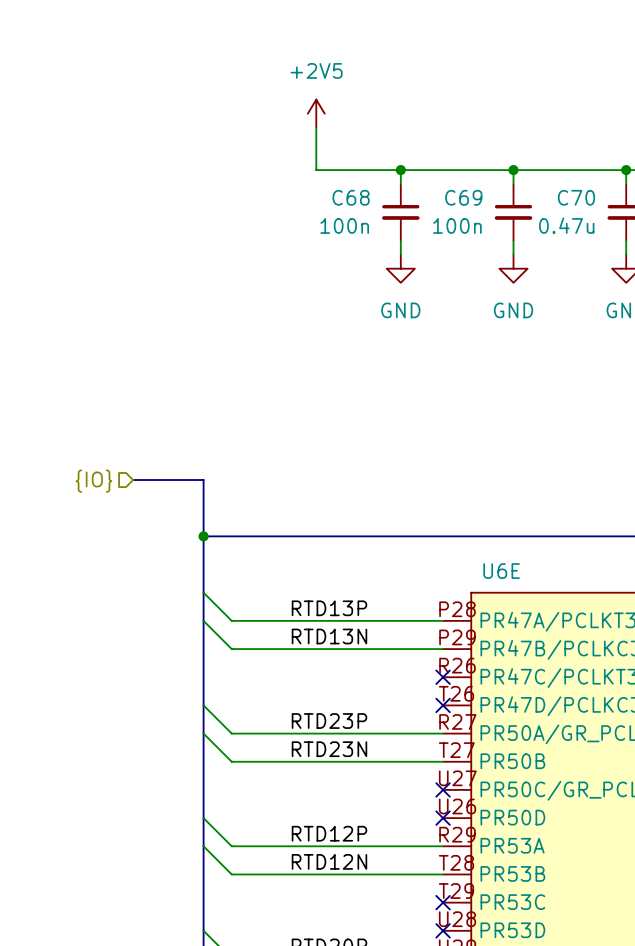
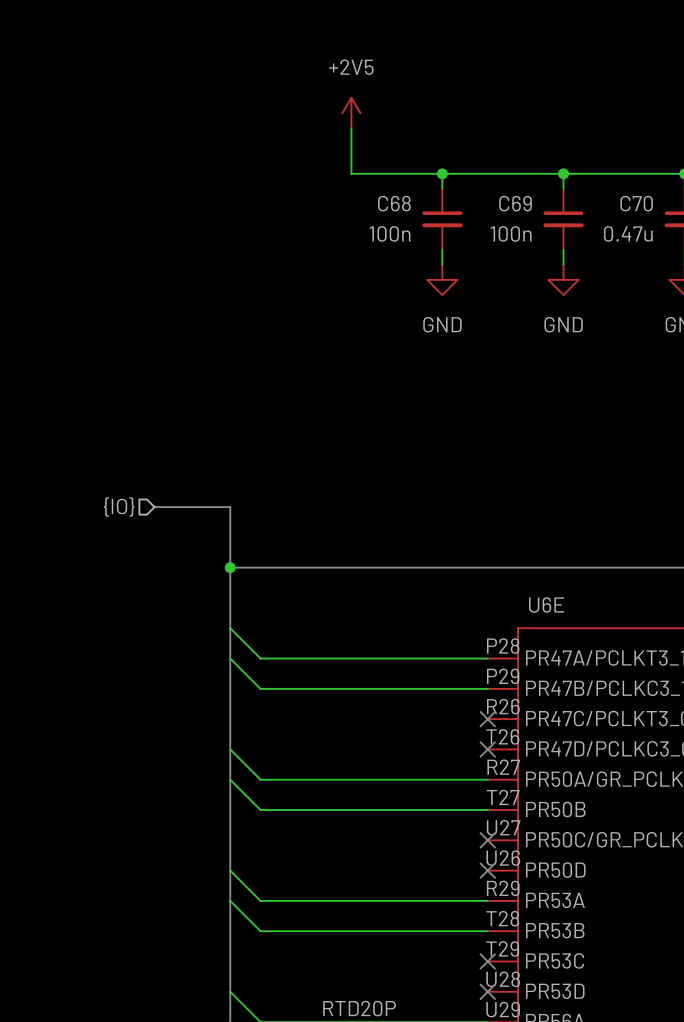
label: RTD13P (329, 608) -> none
label: RTD13N (329, 636) -> none
label: RTD23P (329, 721) -> none
label: RTD23N (329, 749) -> none
label: RTD12P (329, 833) -> none
label: RTD12N (329, 861) -> none

